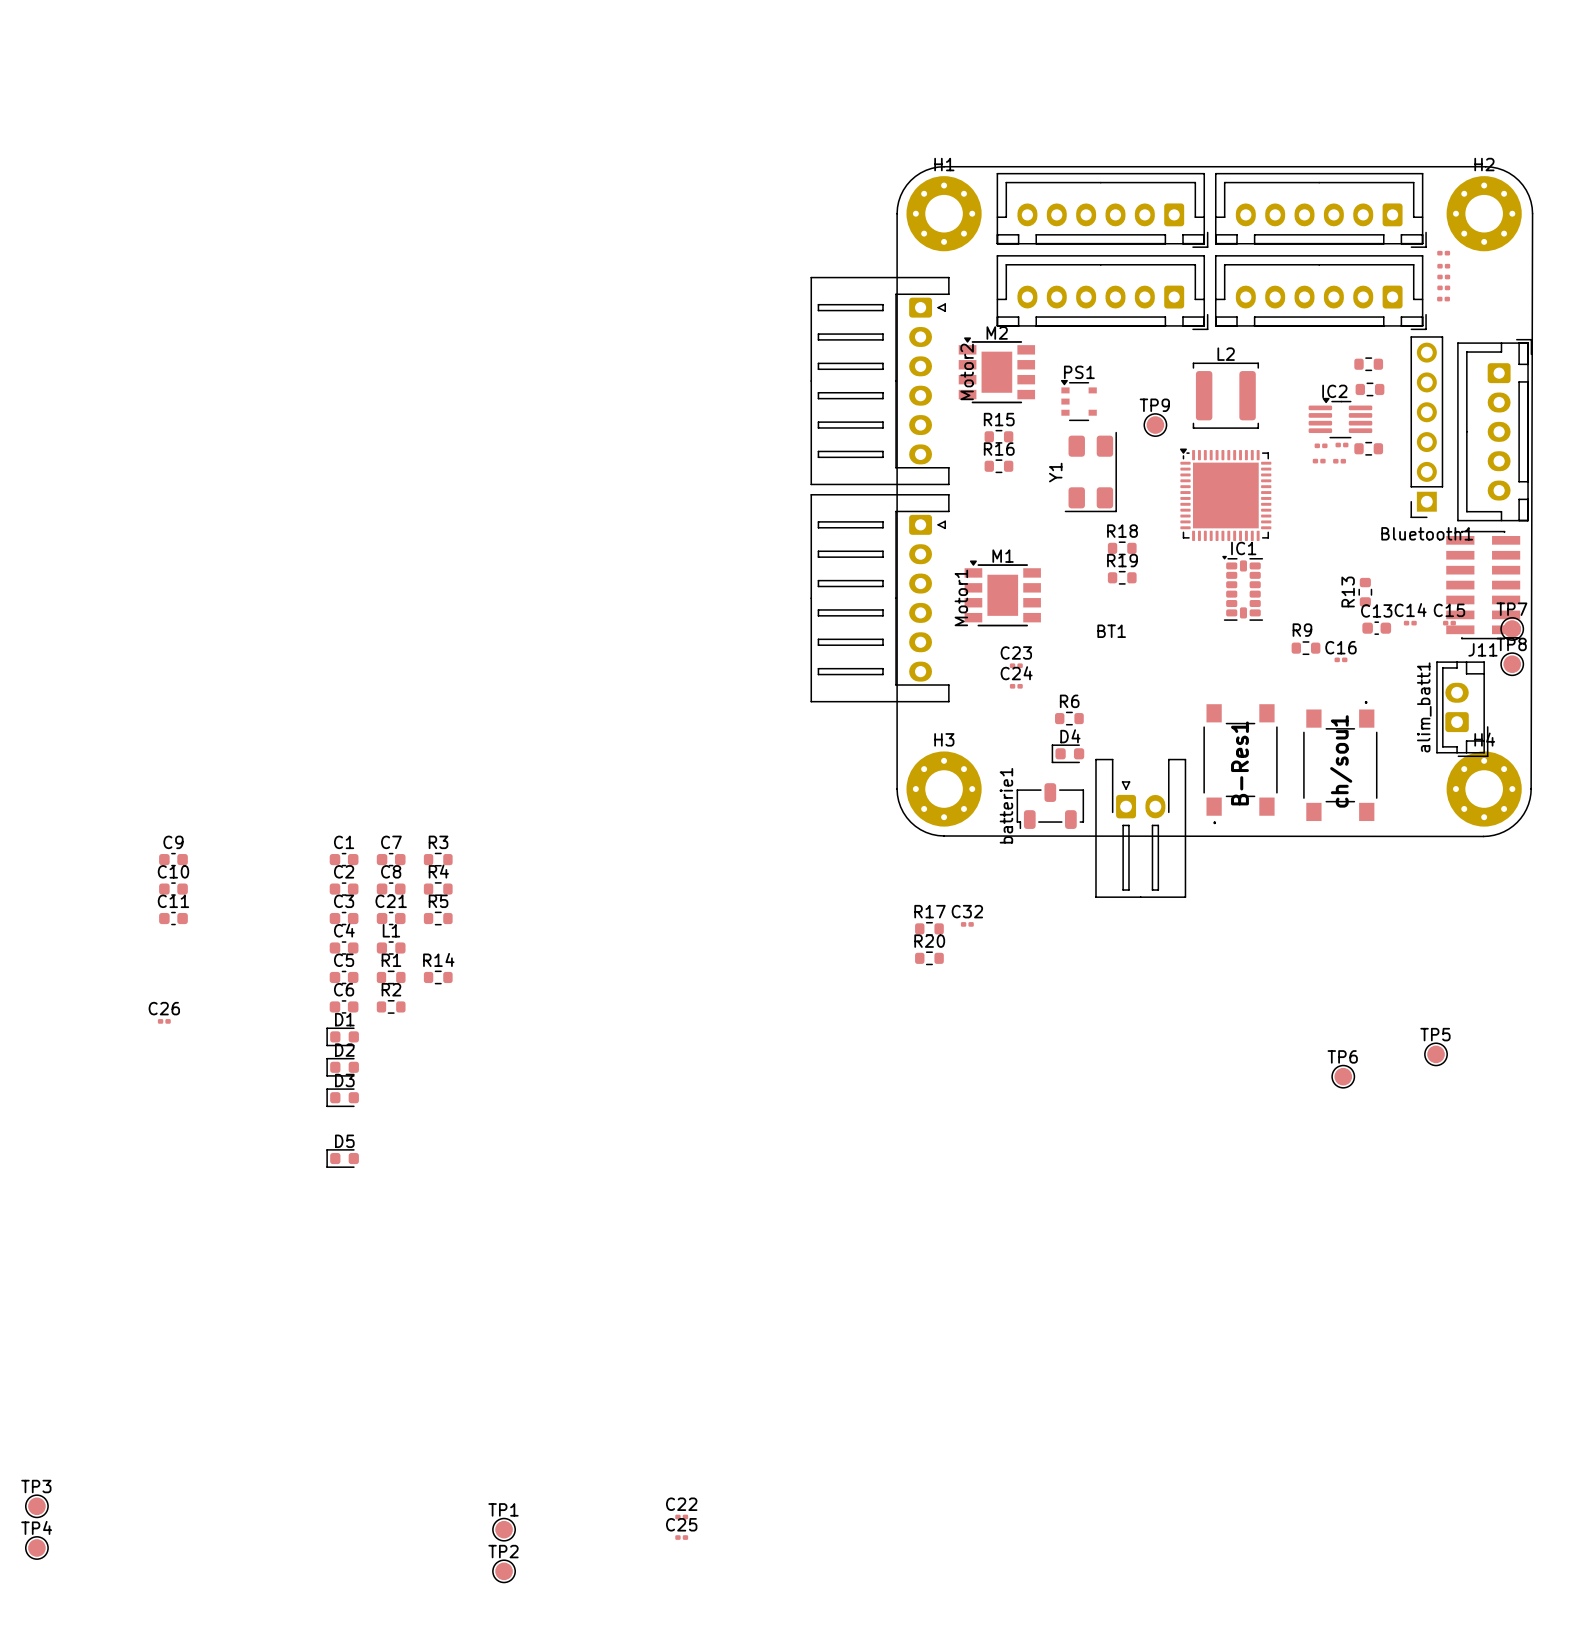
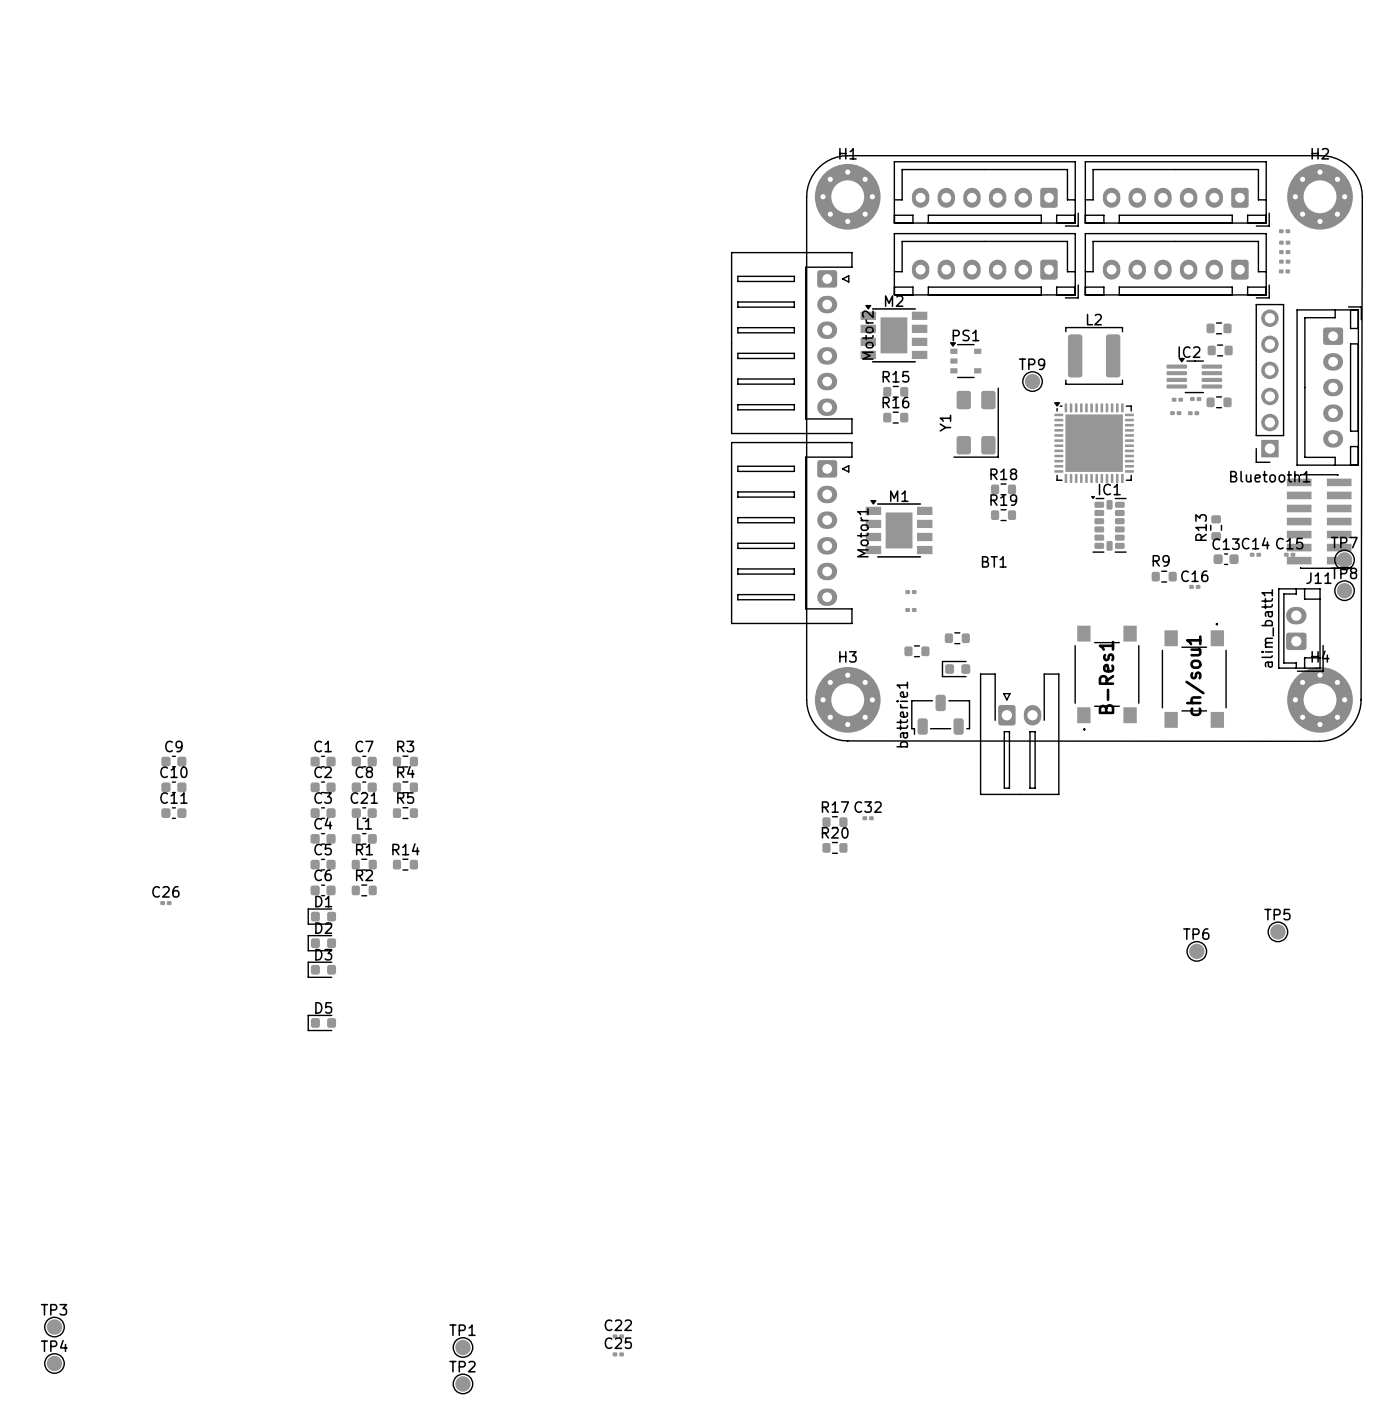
C23 name: C23 (1016, 652) -> none
C24 name: C24 (1016, 673) -> none
R6 name: R6 (1069, 701) -> none
part: none -> (916, 651)
D4 name: D4 (1070, 736) -> none

